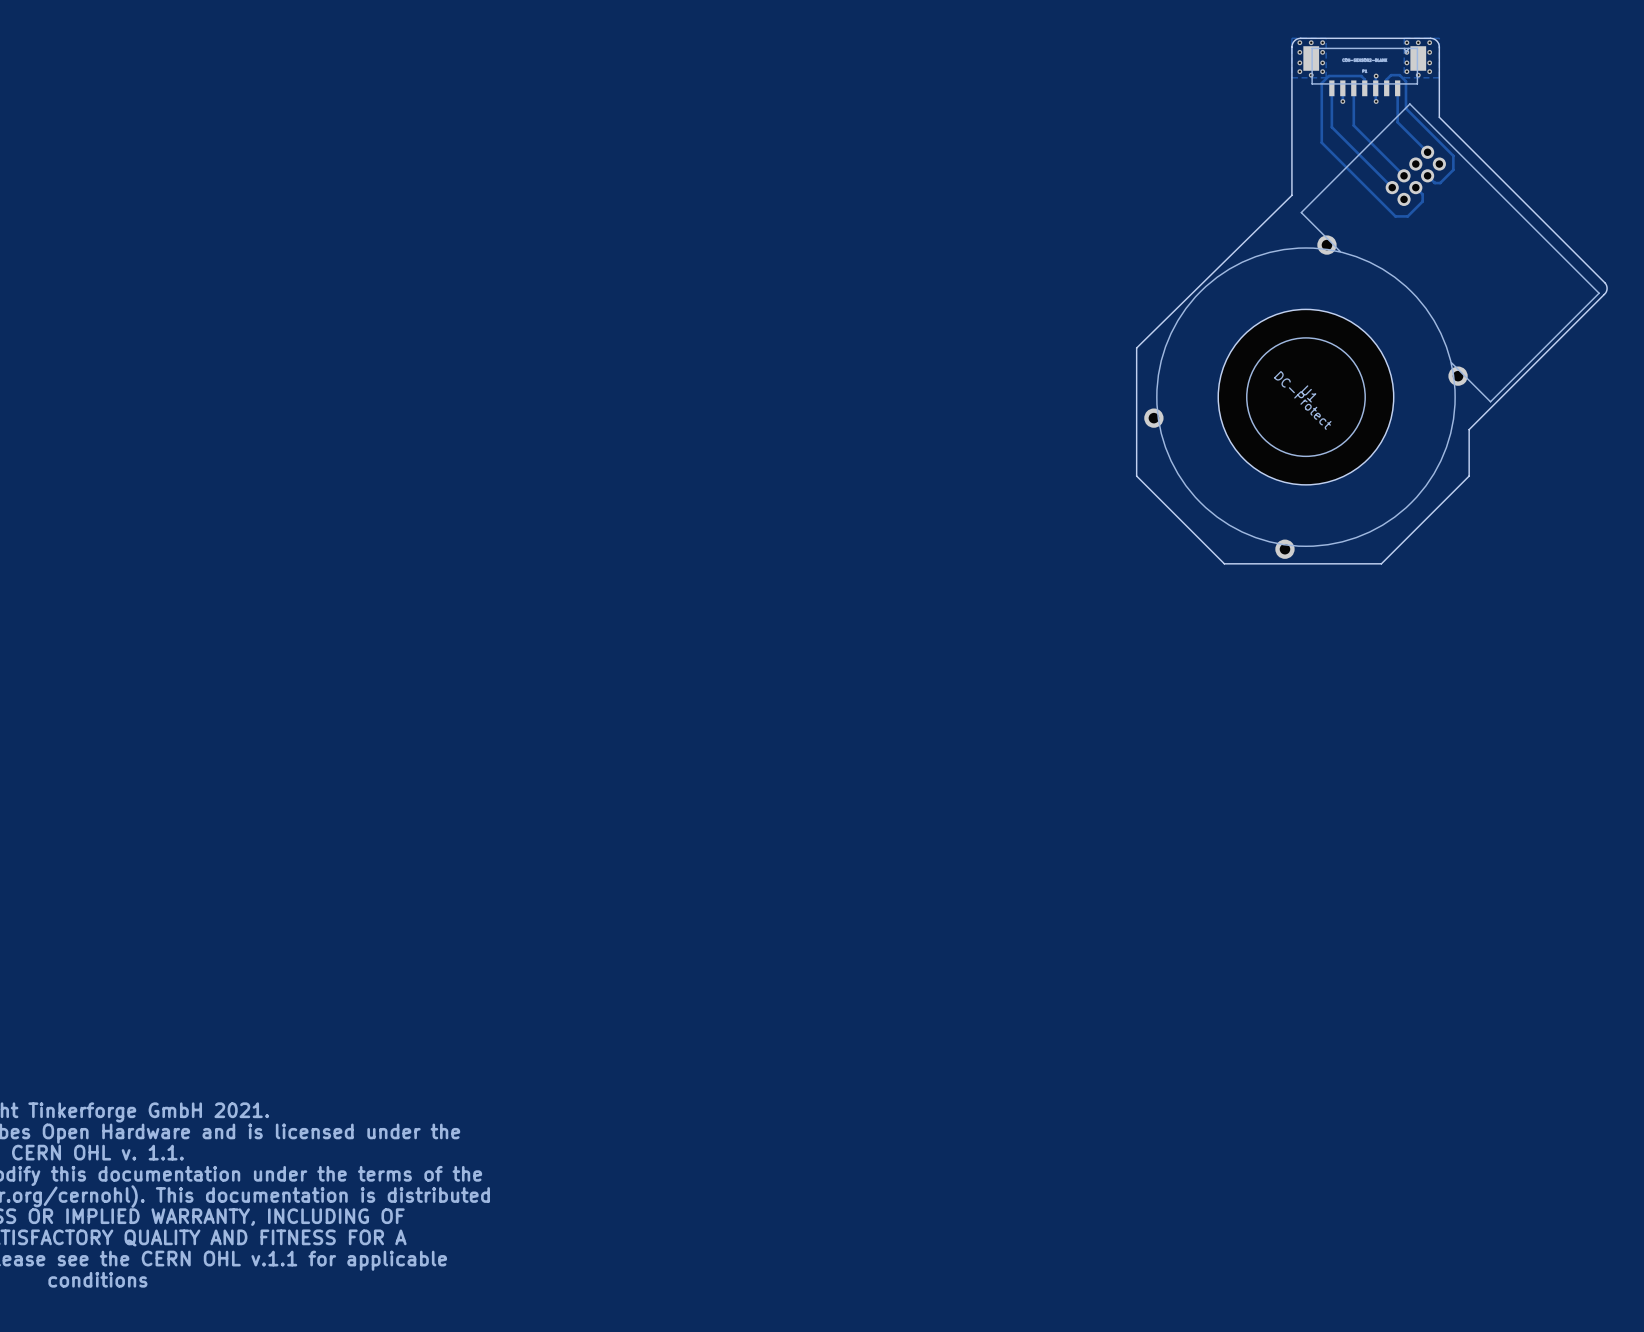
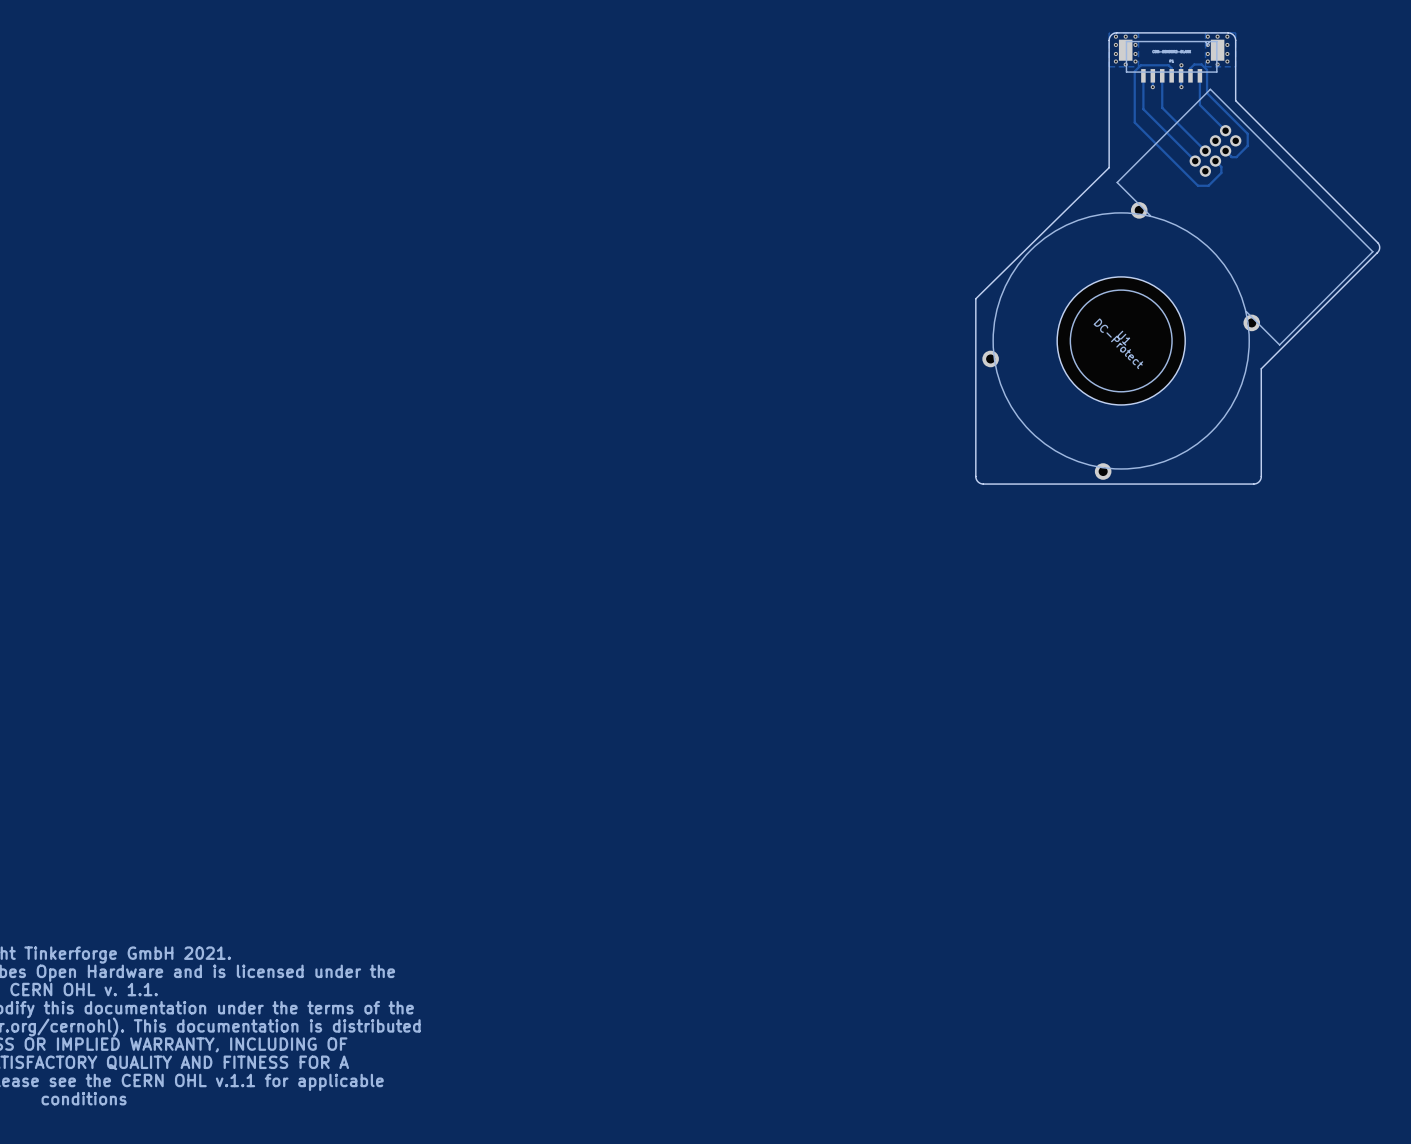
U1 footprint: [1144, 103, 1600, 559] -> [982, 88, 1374, 480]
board edge: (1136, 476) (1224, 563) -> (975, 408) (975, 476) (978, 481) (983, 484) (1051, 484)
board edge: (1469, 476) (1381, 563) -> (1261, 408) (1261, 476) (1259, 481) (1253, 484) (1185, 484)

